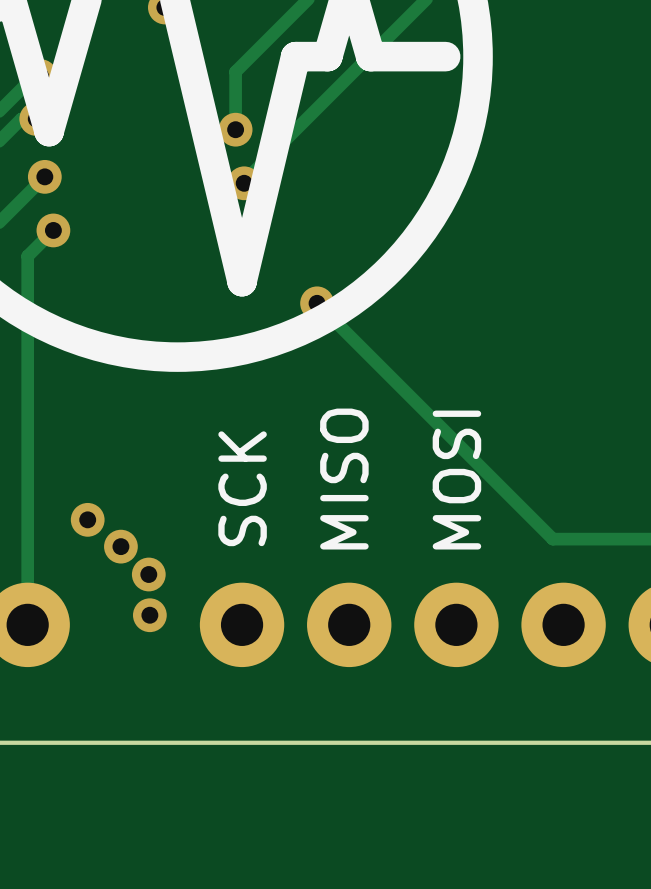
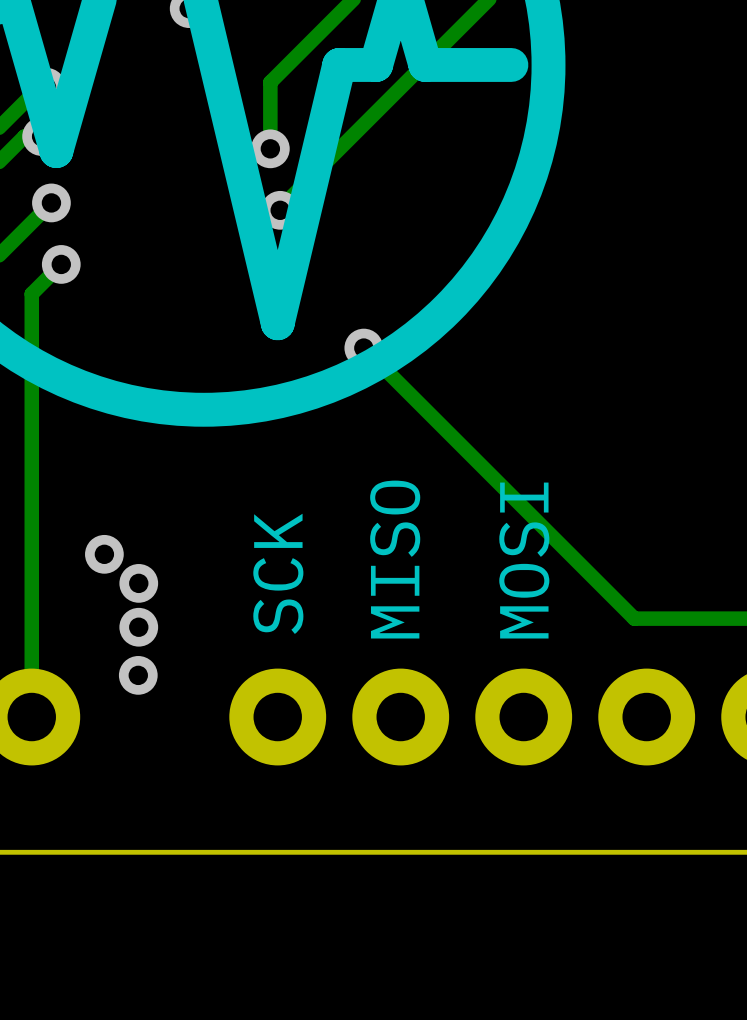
via: none -> (104, 554)
via position: (87, 519) -> (138, 583)
via: (148, 574) -> none
via: none -> (138, 675)
via: (149, 615) -> none

